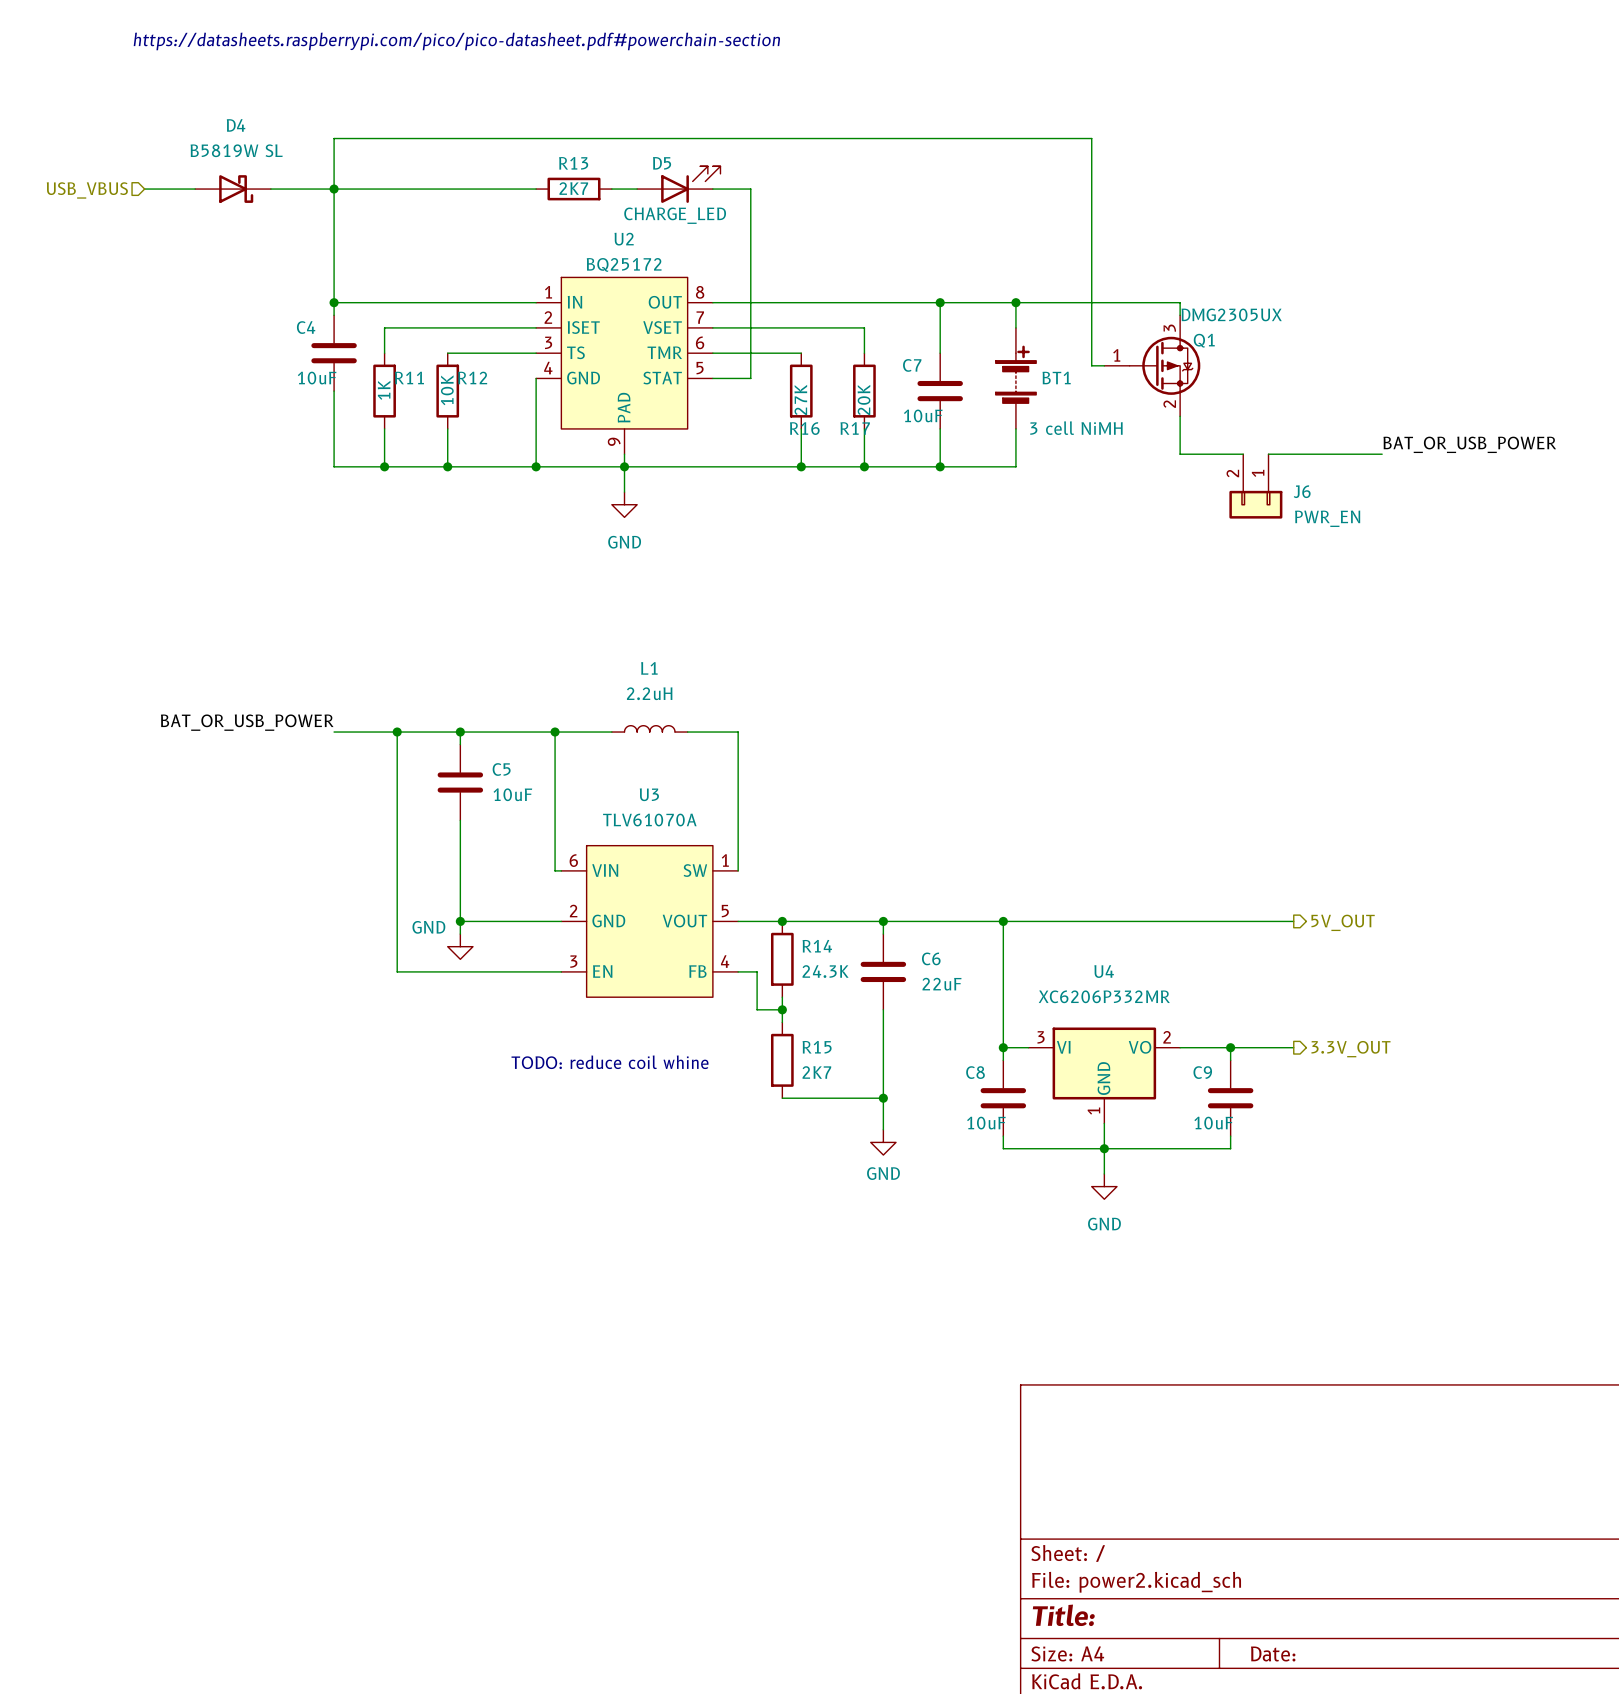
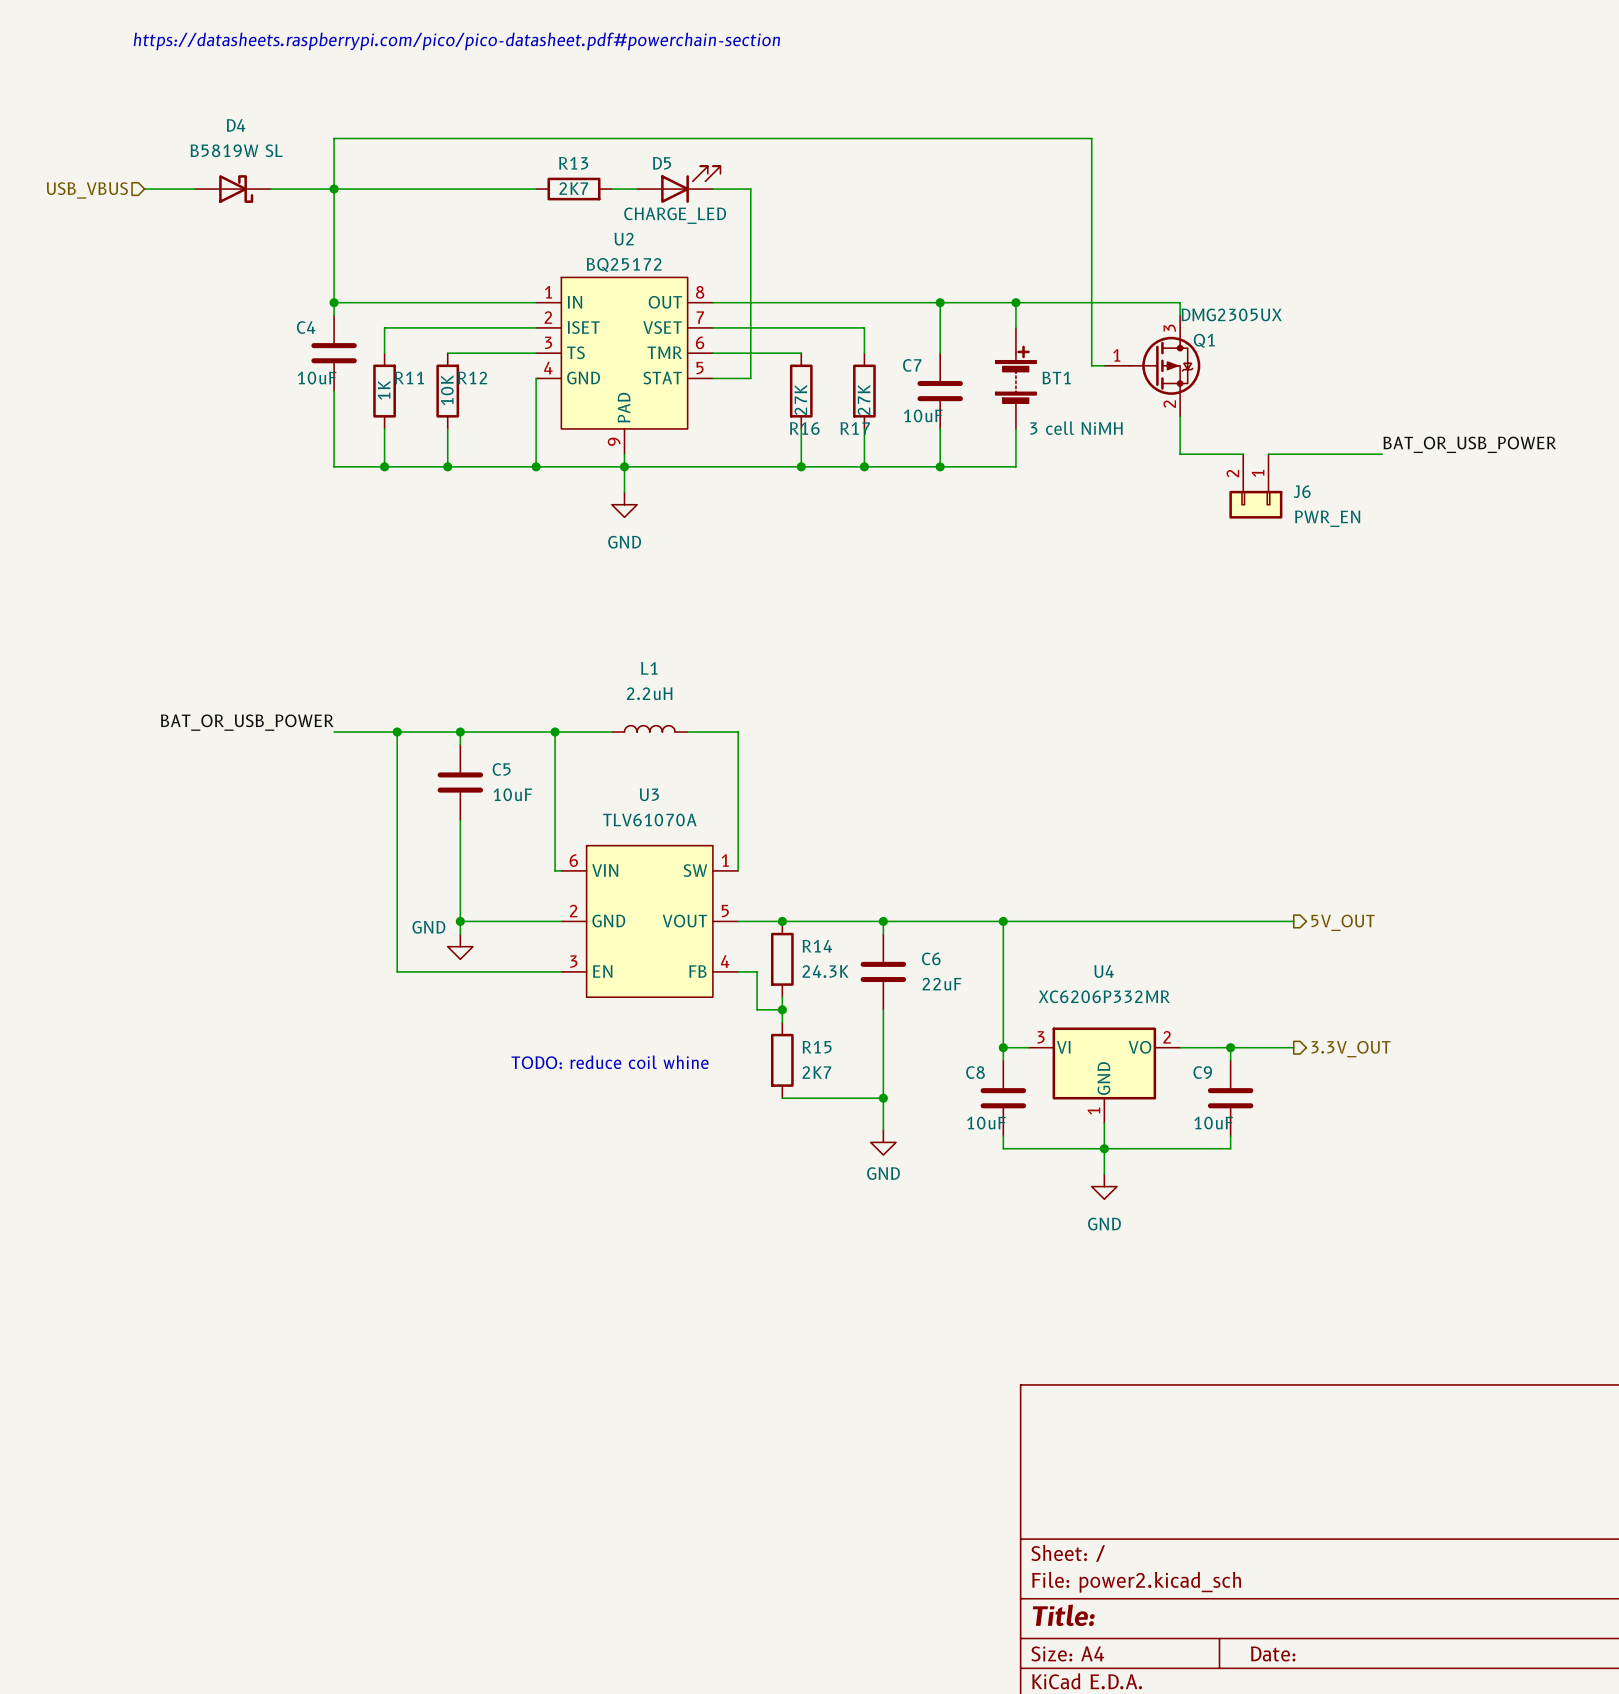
R17 value: 20K (864, 399) -> 27K (863, 399)

